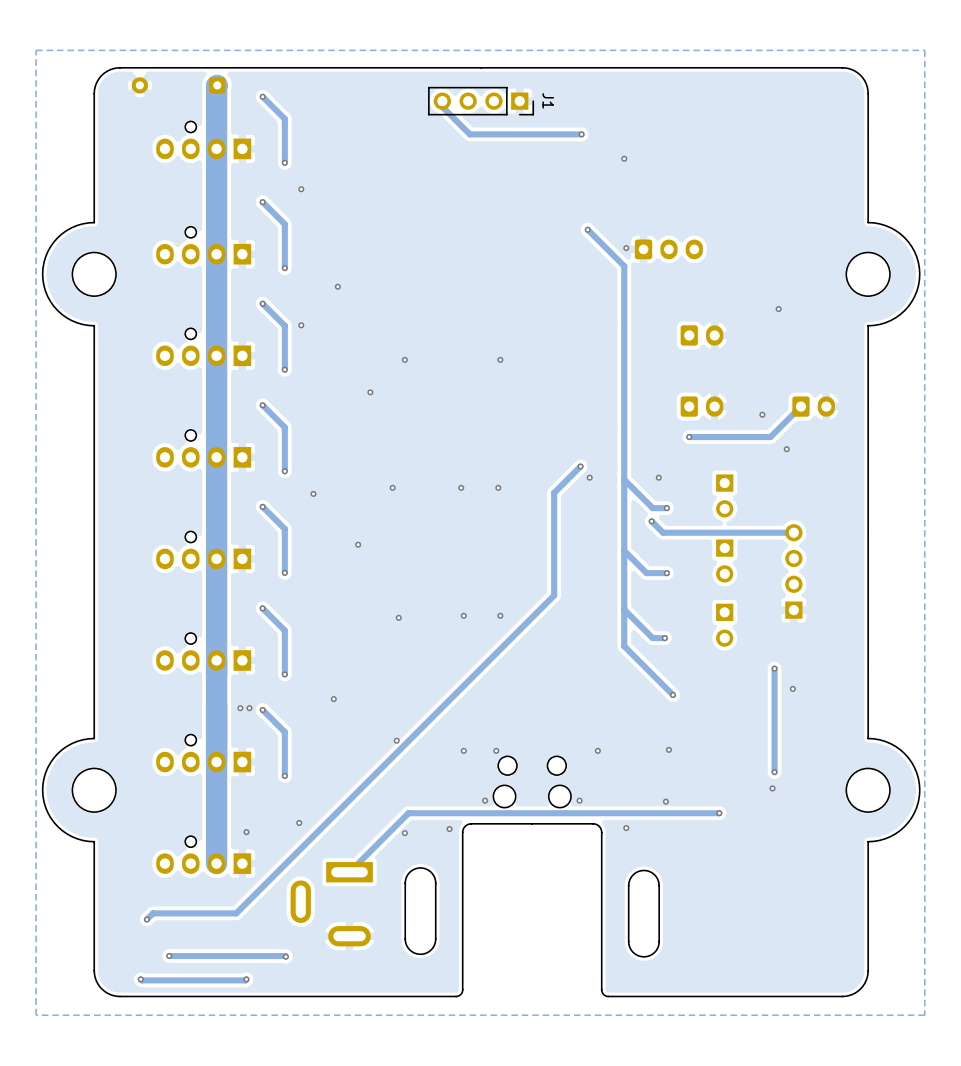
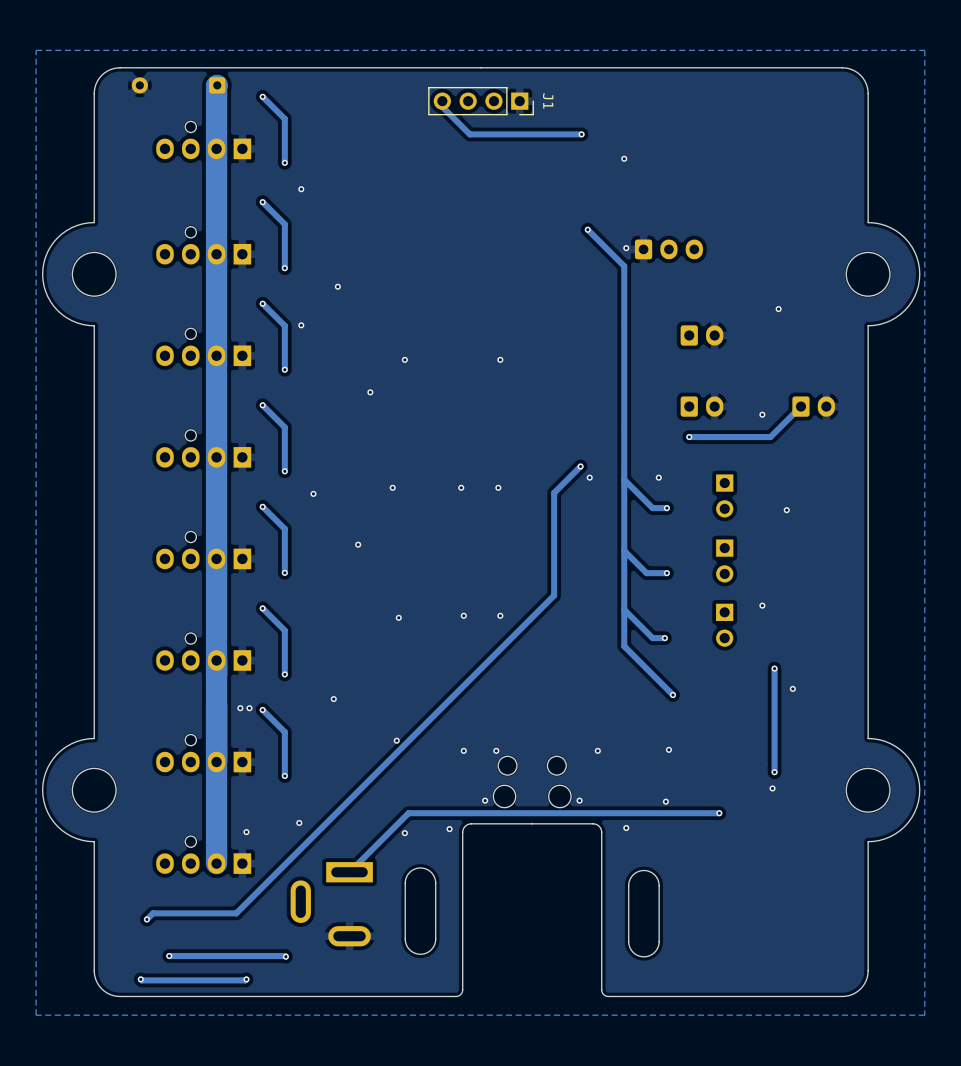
via position: (786, 449) -> (786, 510)
track: (651, 521) (663, 532) (793, 532) -> none
via: (651, 521) -> none
part: (793, 571) -> none
via: none -> (762, 605)

